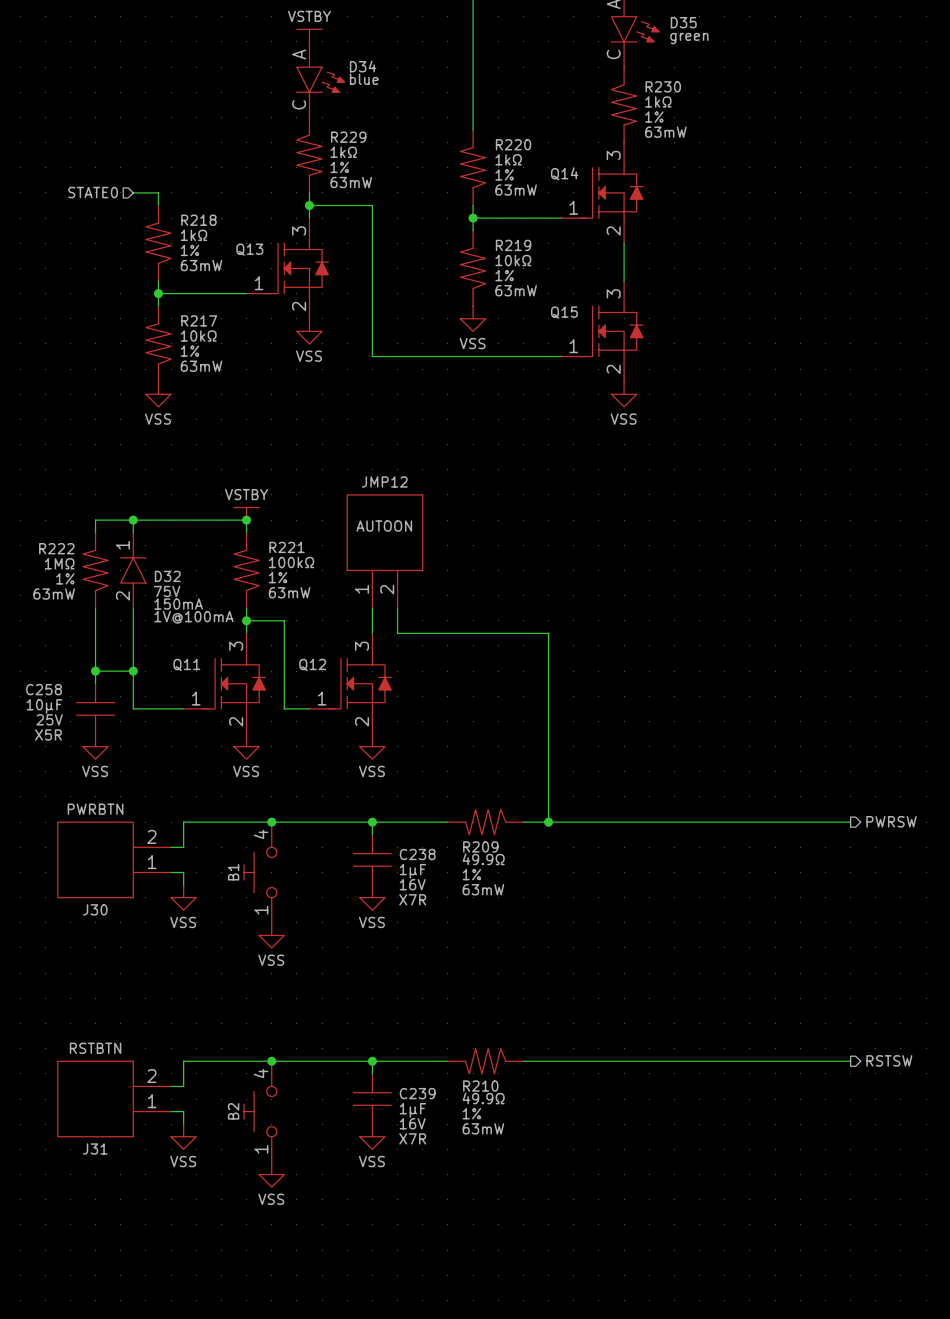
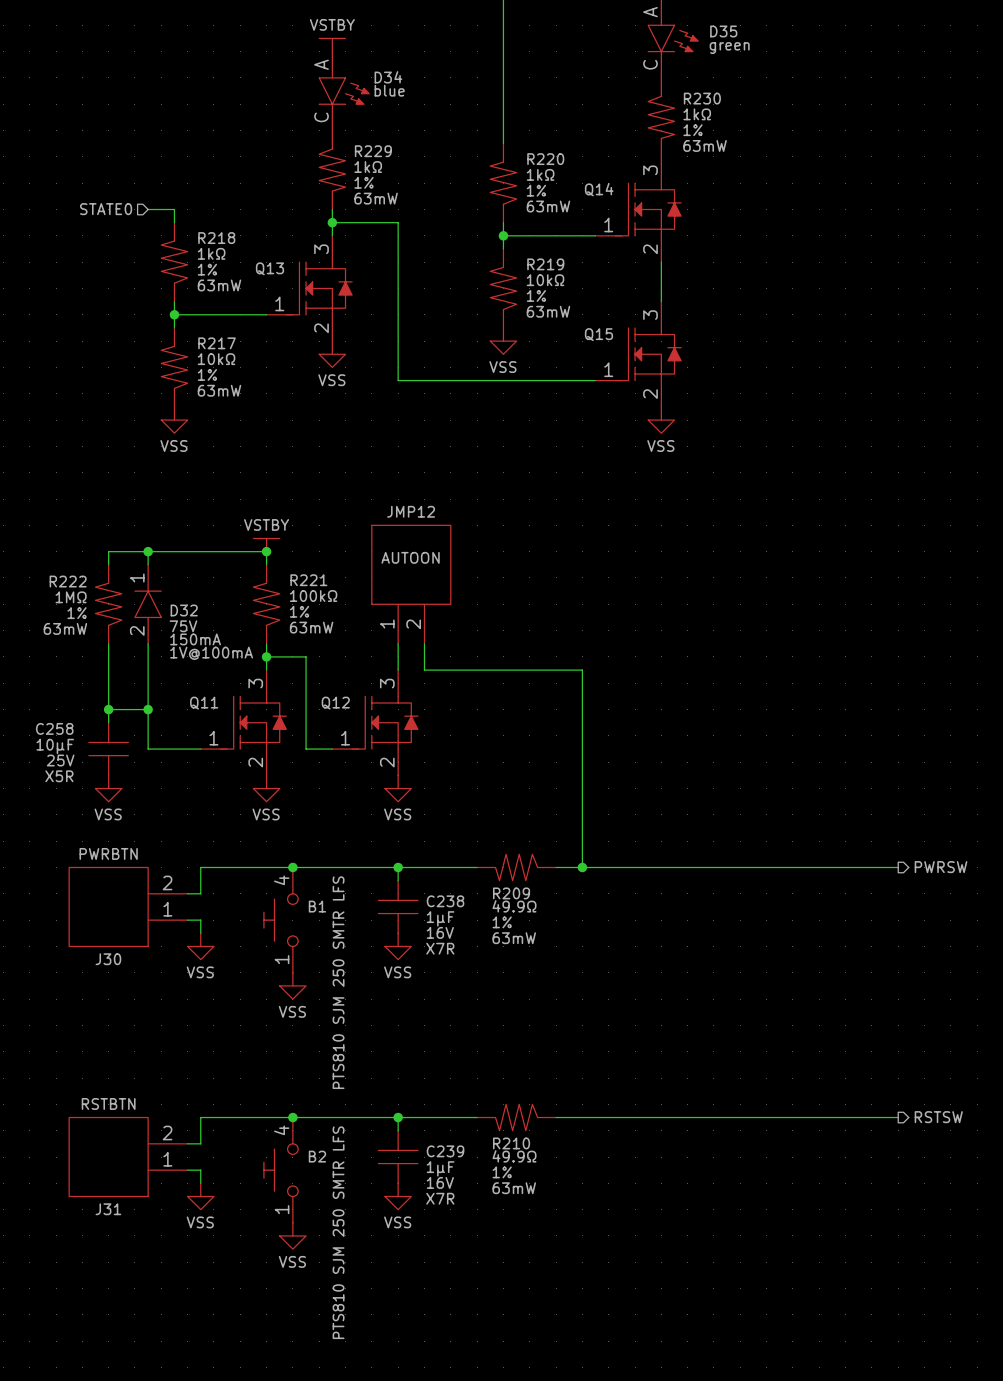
B1 name rotation: 0° (233, 872) -> 90° clockwise (317, 906)
B1 name position: B1 (233, 872) -> B1 (317, 906)
B1 text: none -> PTS810 SJM 250 SMTR LFS (338, 982)
B2 name rotation: 0° (233, 1111) -> 90° clockwise (317, 1156)
B2 name position: B2 (233, 1111) -> B2 (317, 1156)
B2 text: none -> PTS810 SJM 250 SMTR LFS (338, 1232)

